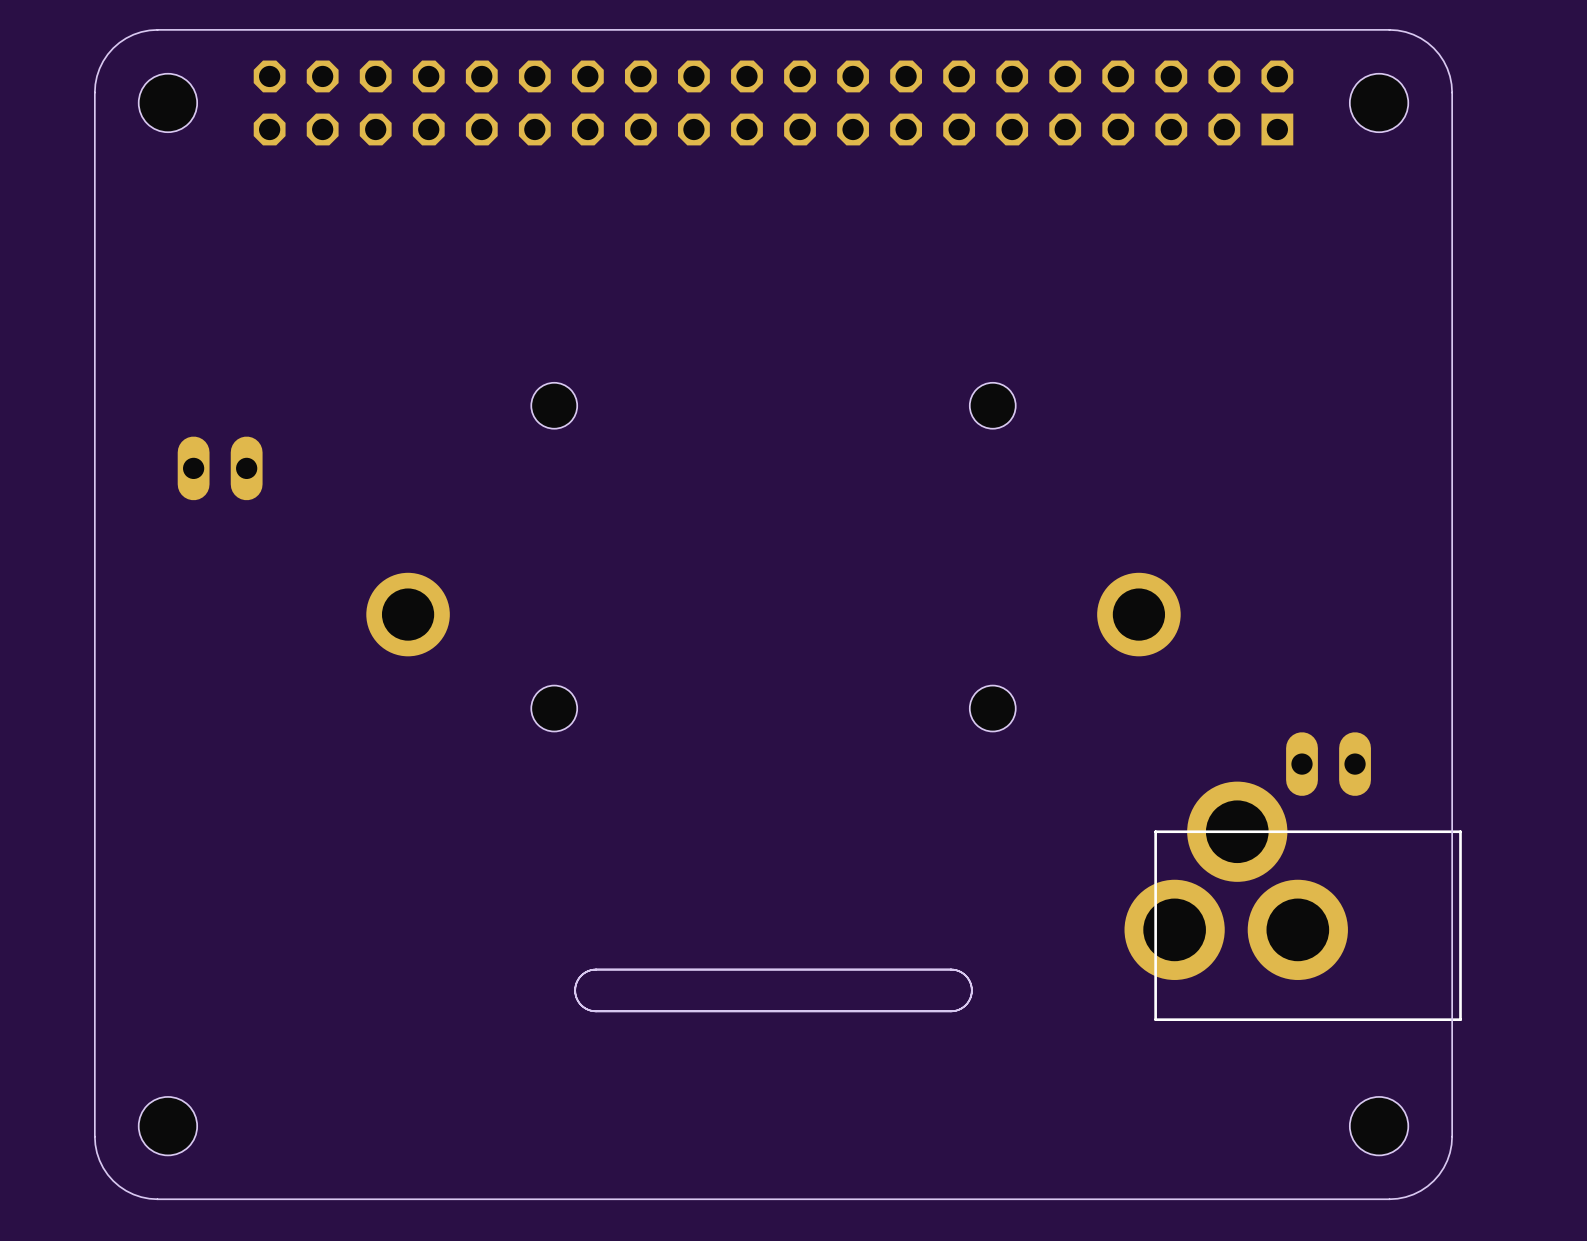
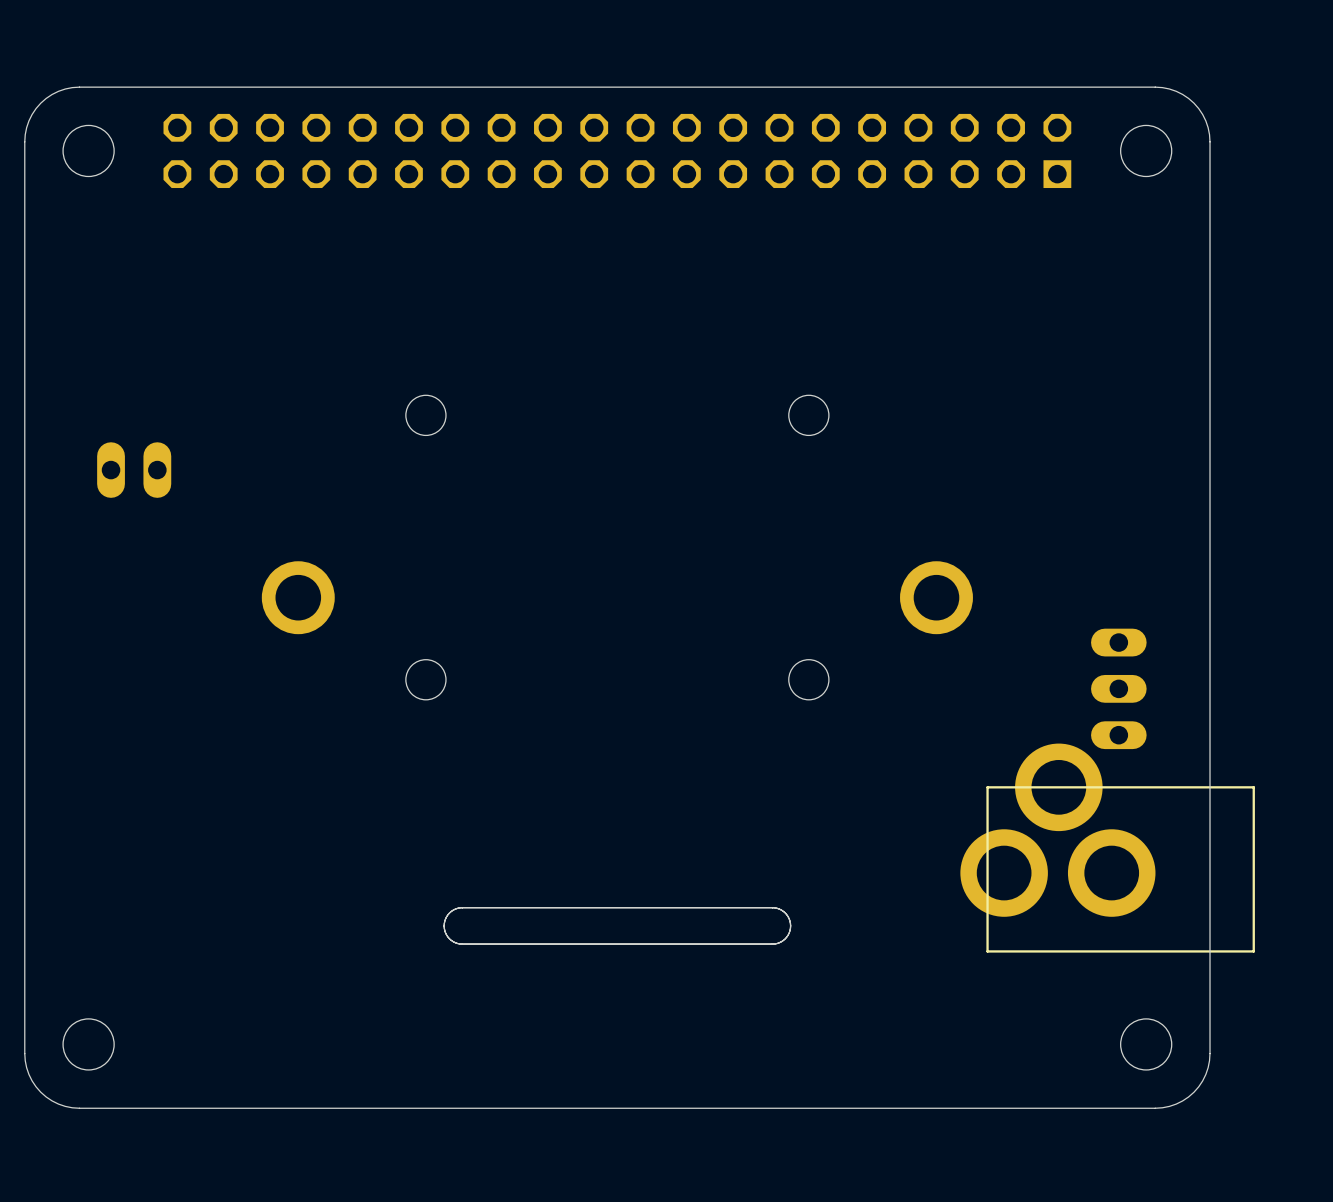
part: none -> (1118, 688)
part: (1328, 764) -> none
part position: (1293, 901) -> (1107, 848)

